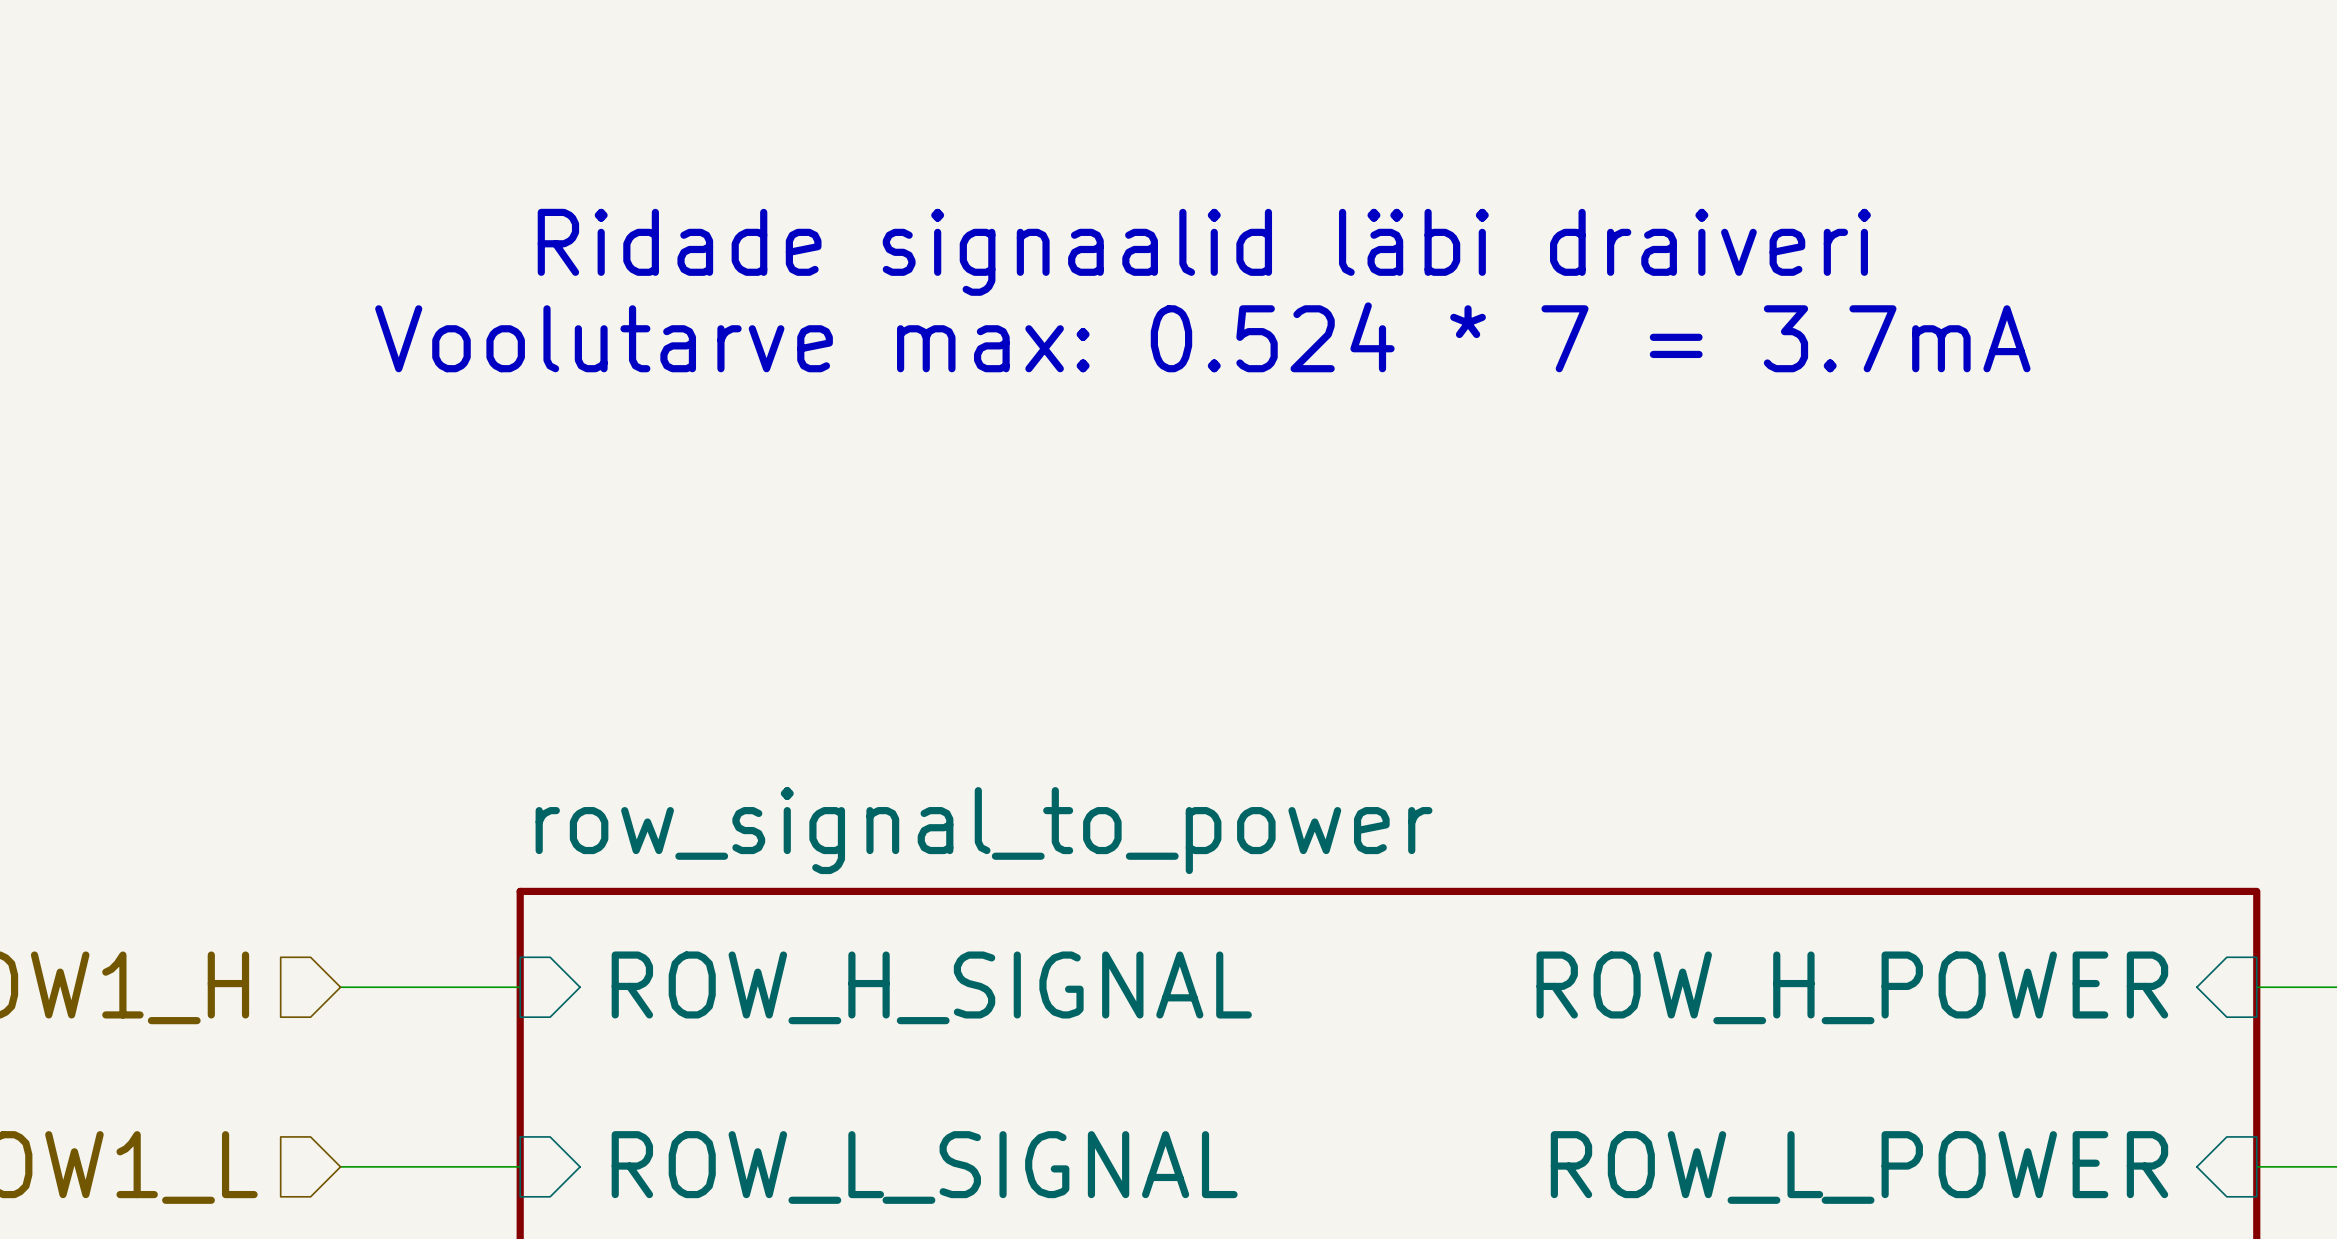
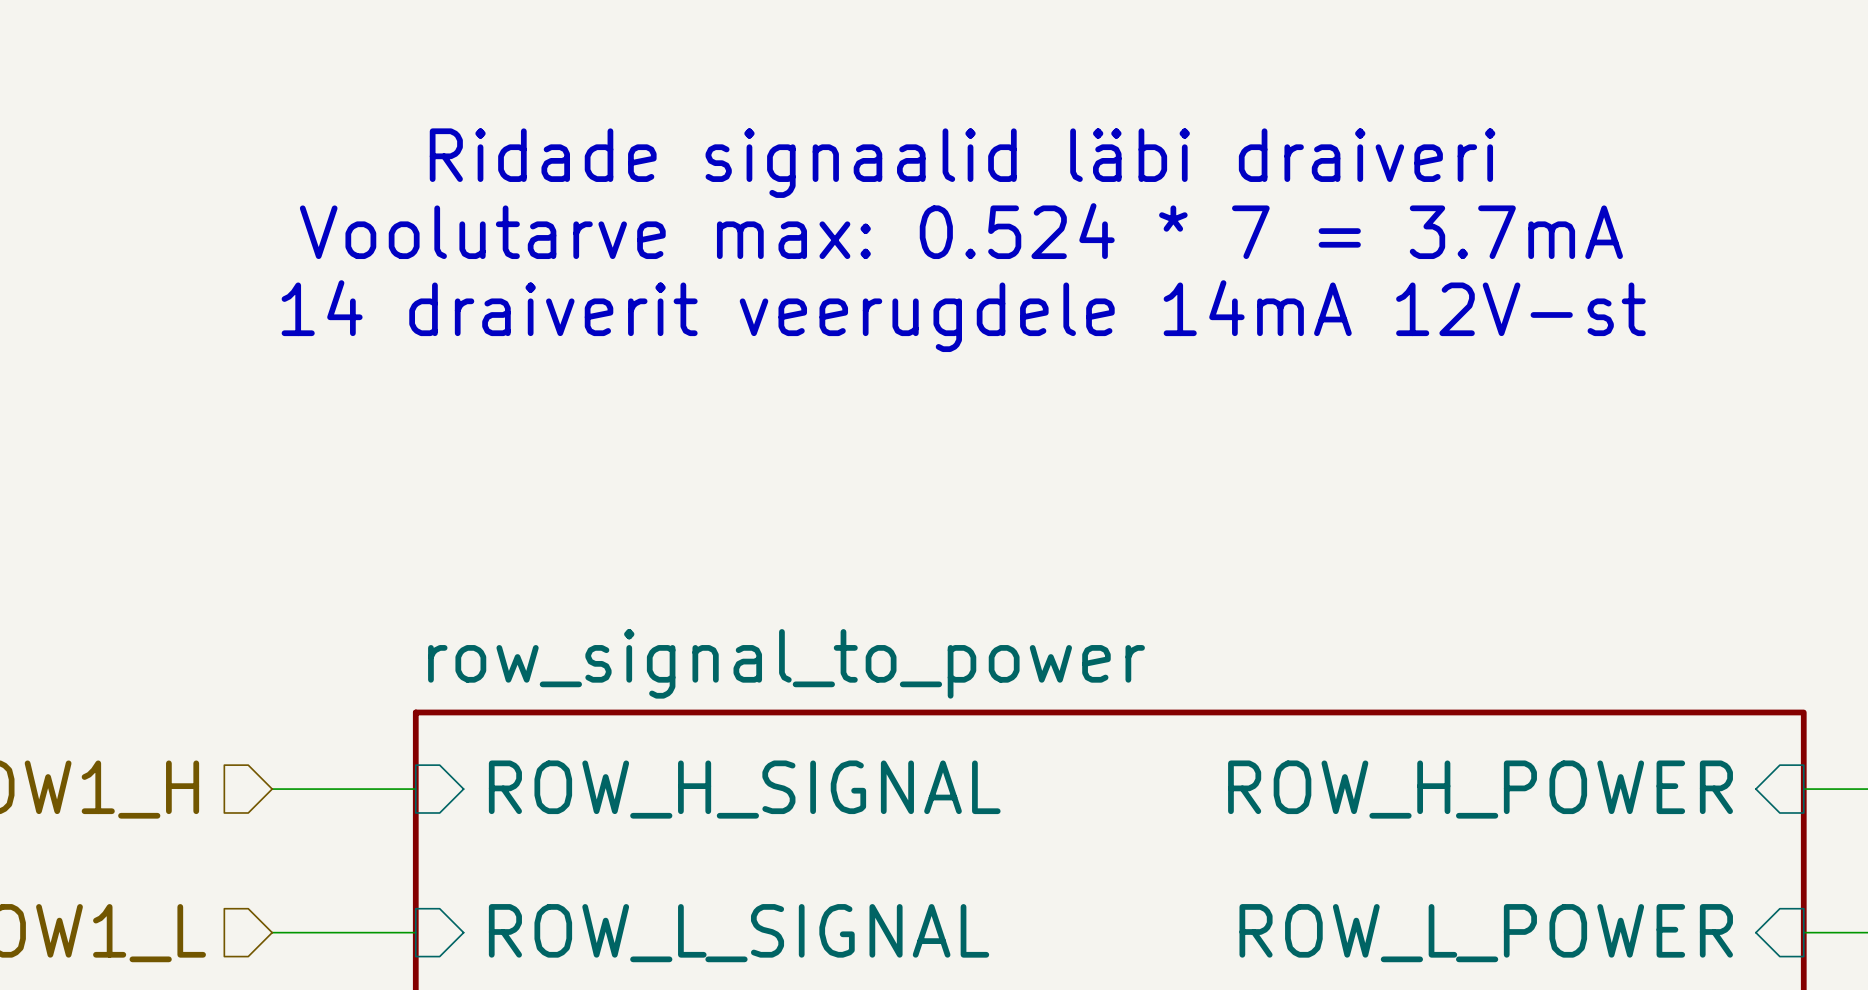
text position: Ridade signaalid läbi draiveri (1204, 252) -> Ridade signaalid läbi draiveri (962, 163)
text position: Voolutarve max: 0.524 * 7 = 3.7mA (1202, 337) -> Voolutarve max: 0.524 * 7 = 3.7mA (961, 231)
text: none -> 14 draiverit veerugdele 14mA 12V-st (963, 316)

